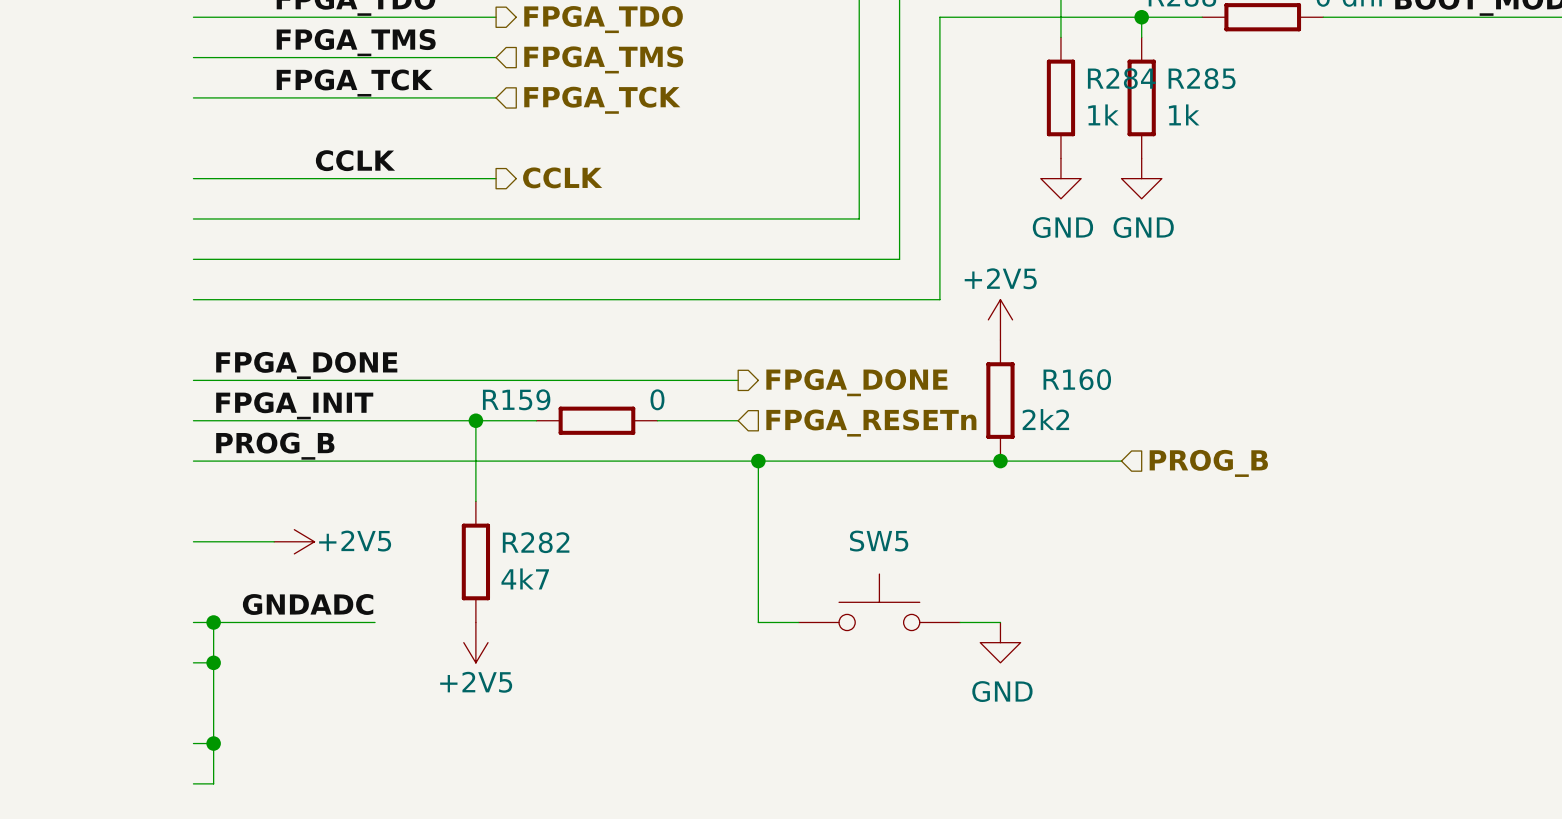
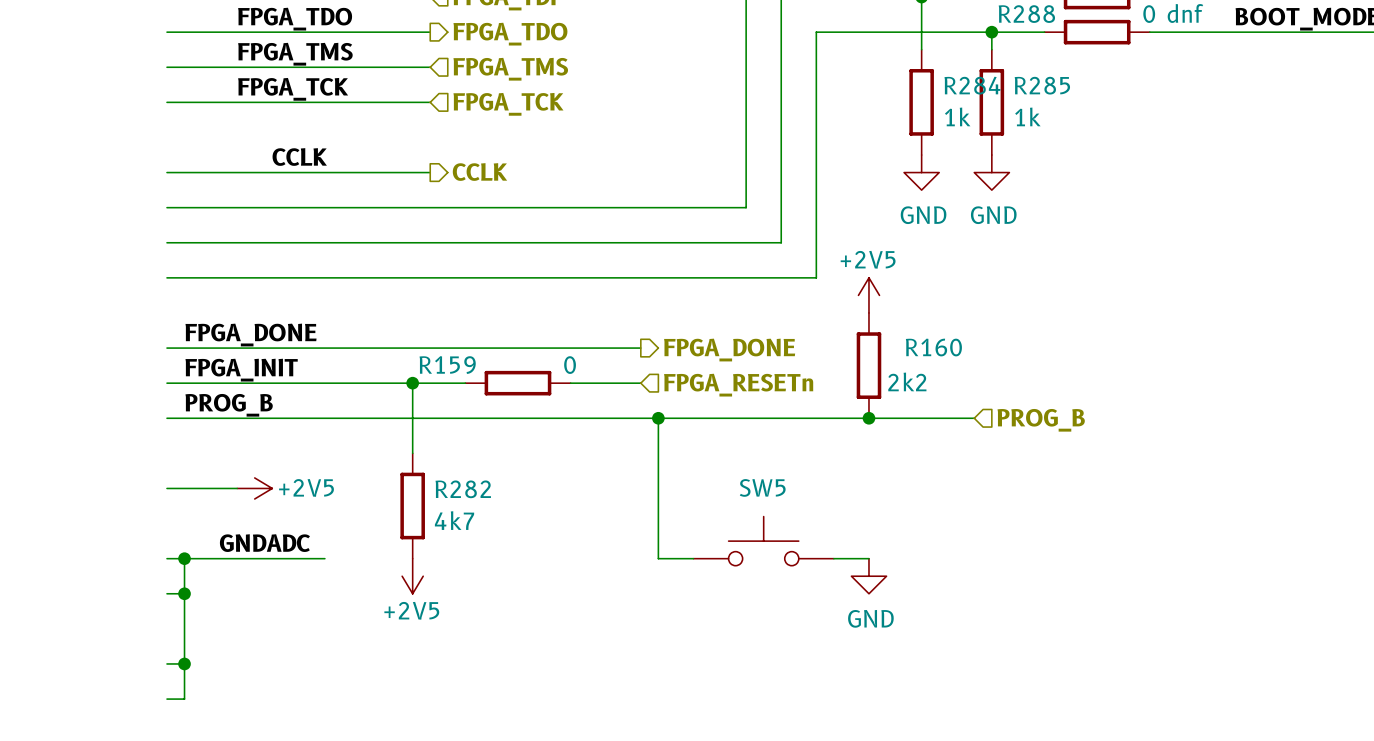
label position: GNDADC (308, 604) -> GNDADC (264, 543)

